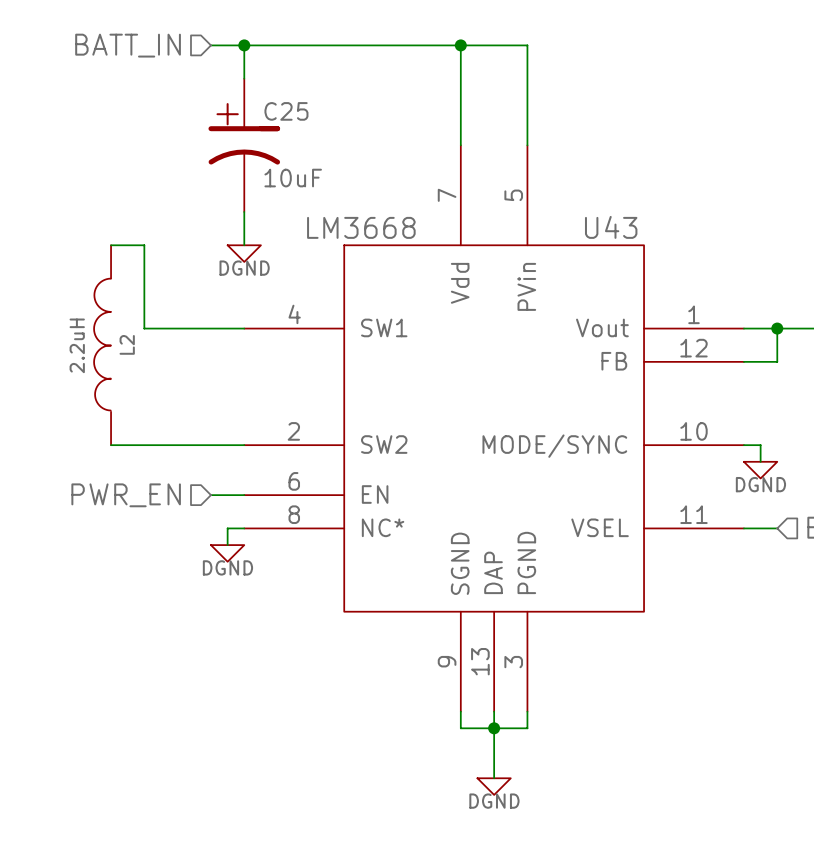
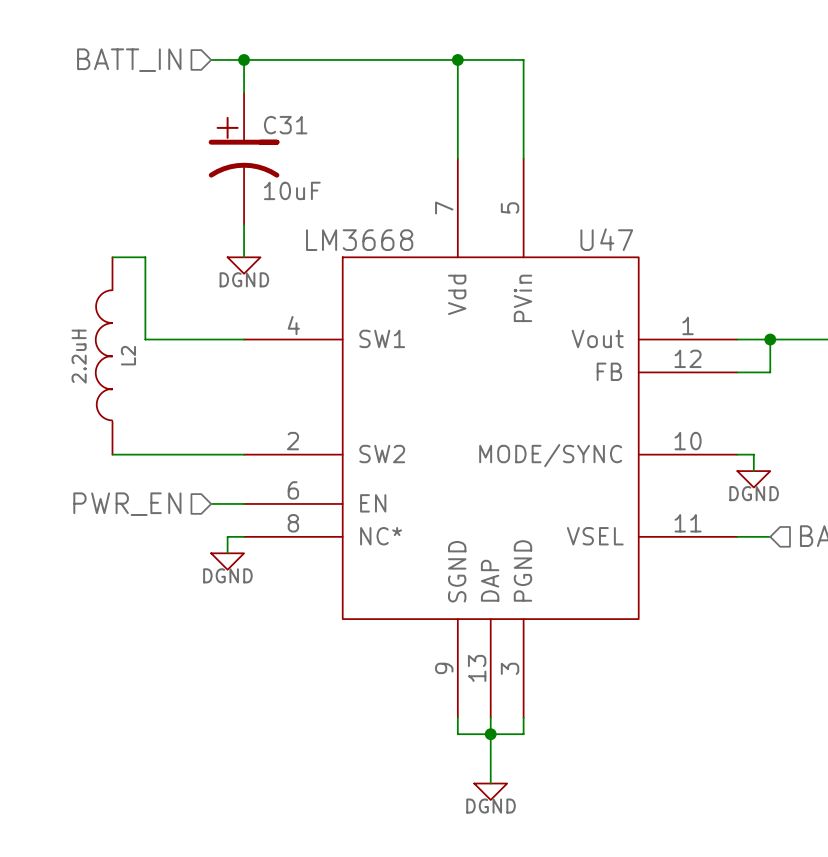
C25 name: C25 (286, 111) -> C31 (285, 125)
U43 name: U43 (611, 227) -> U47 (606, 239)

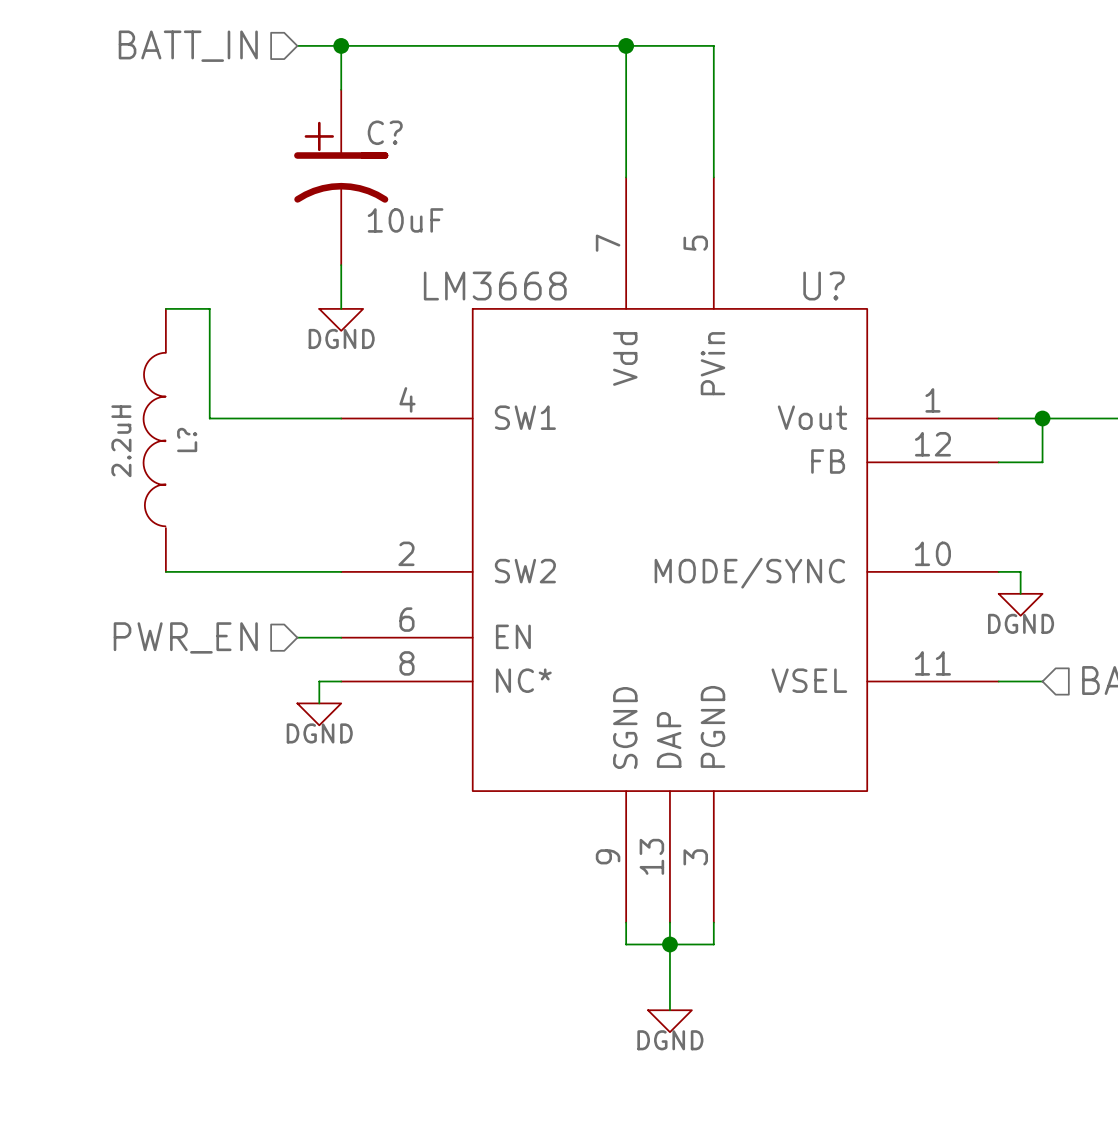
C31 name: C31 (285, 125) -> C? (385, 132)
U47 name: U47 (606, 239) -> U? (824, 286)
L2 name: L2 (128, 355) -> L? (187, 440)

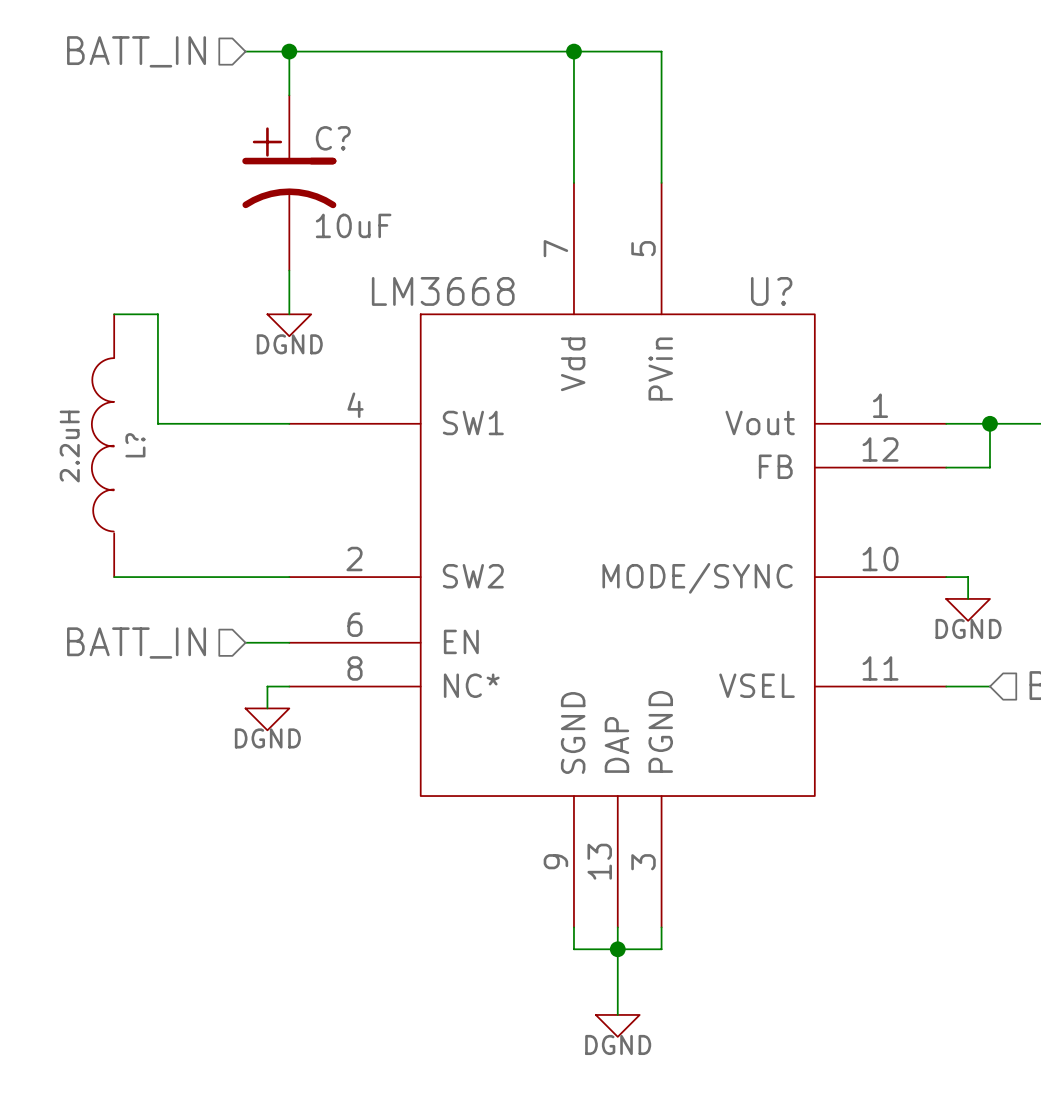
hierarchical label: PWR_EN (185, 637) -> BATT_IN (136, 643)

